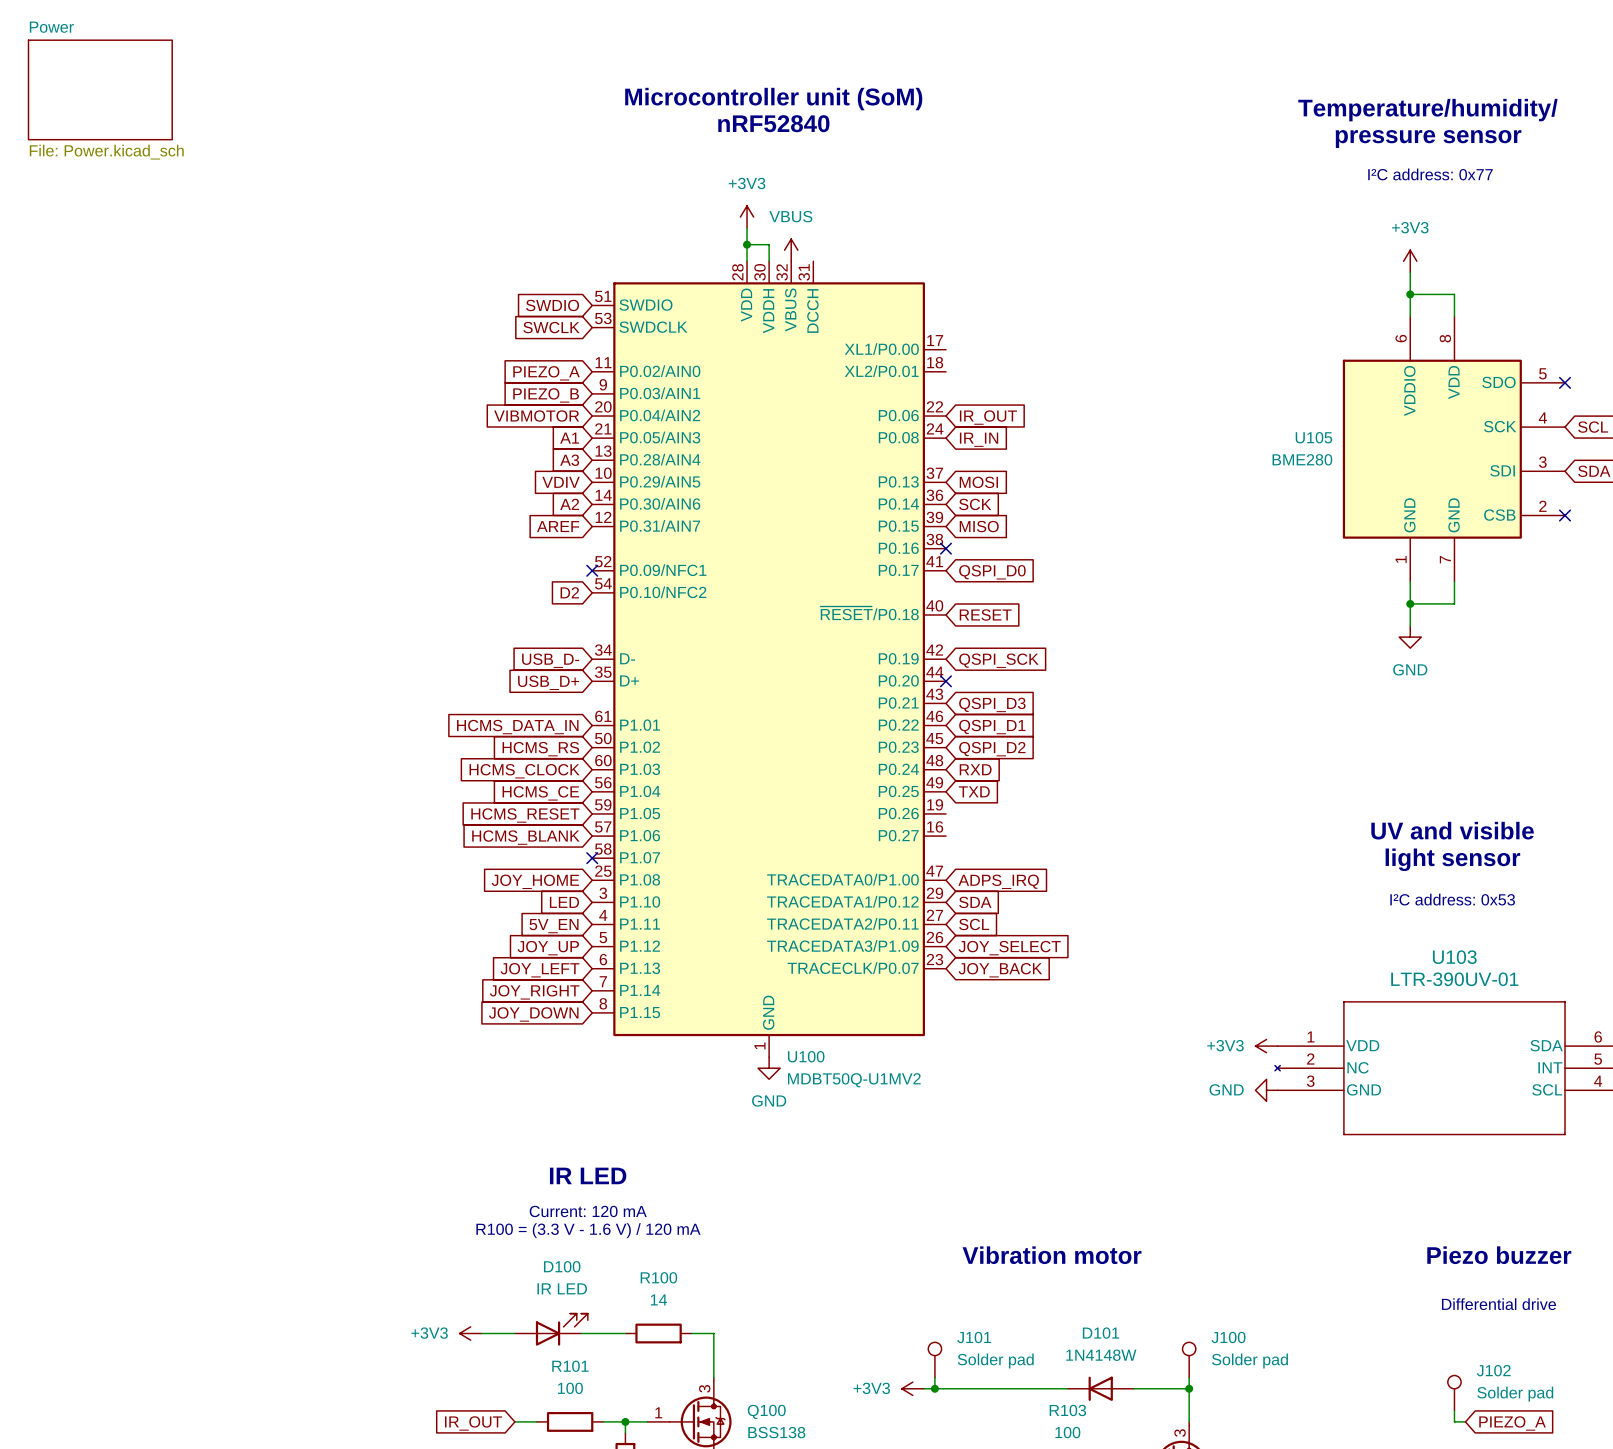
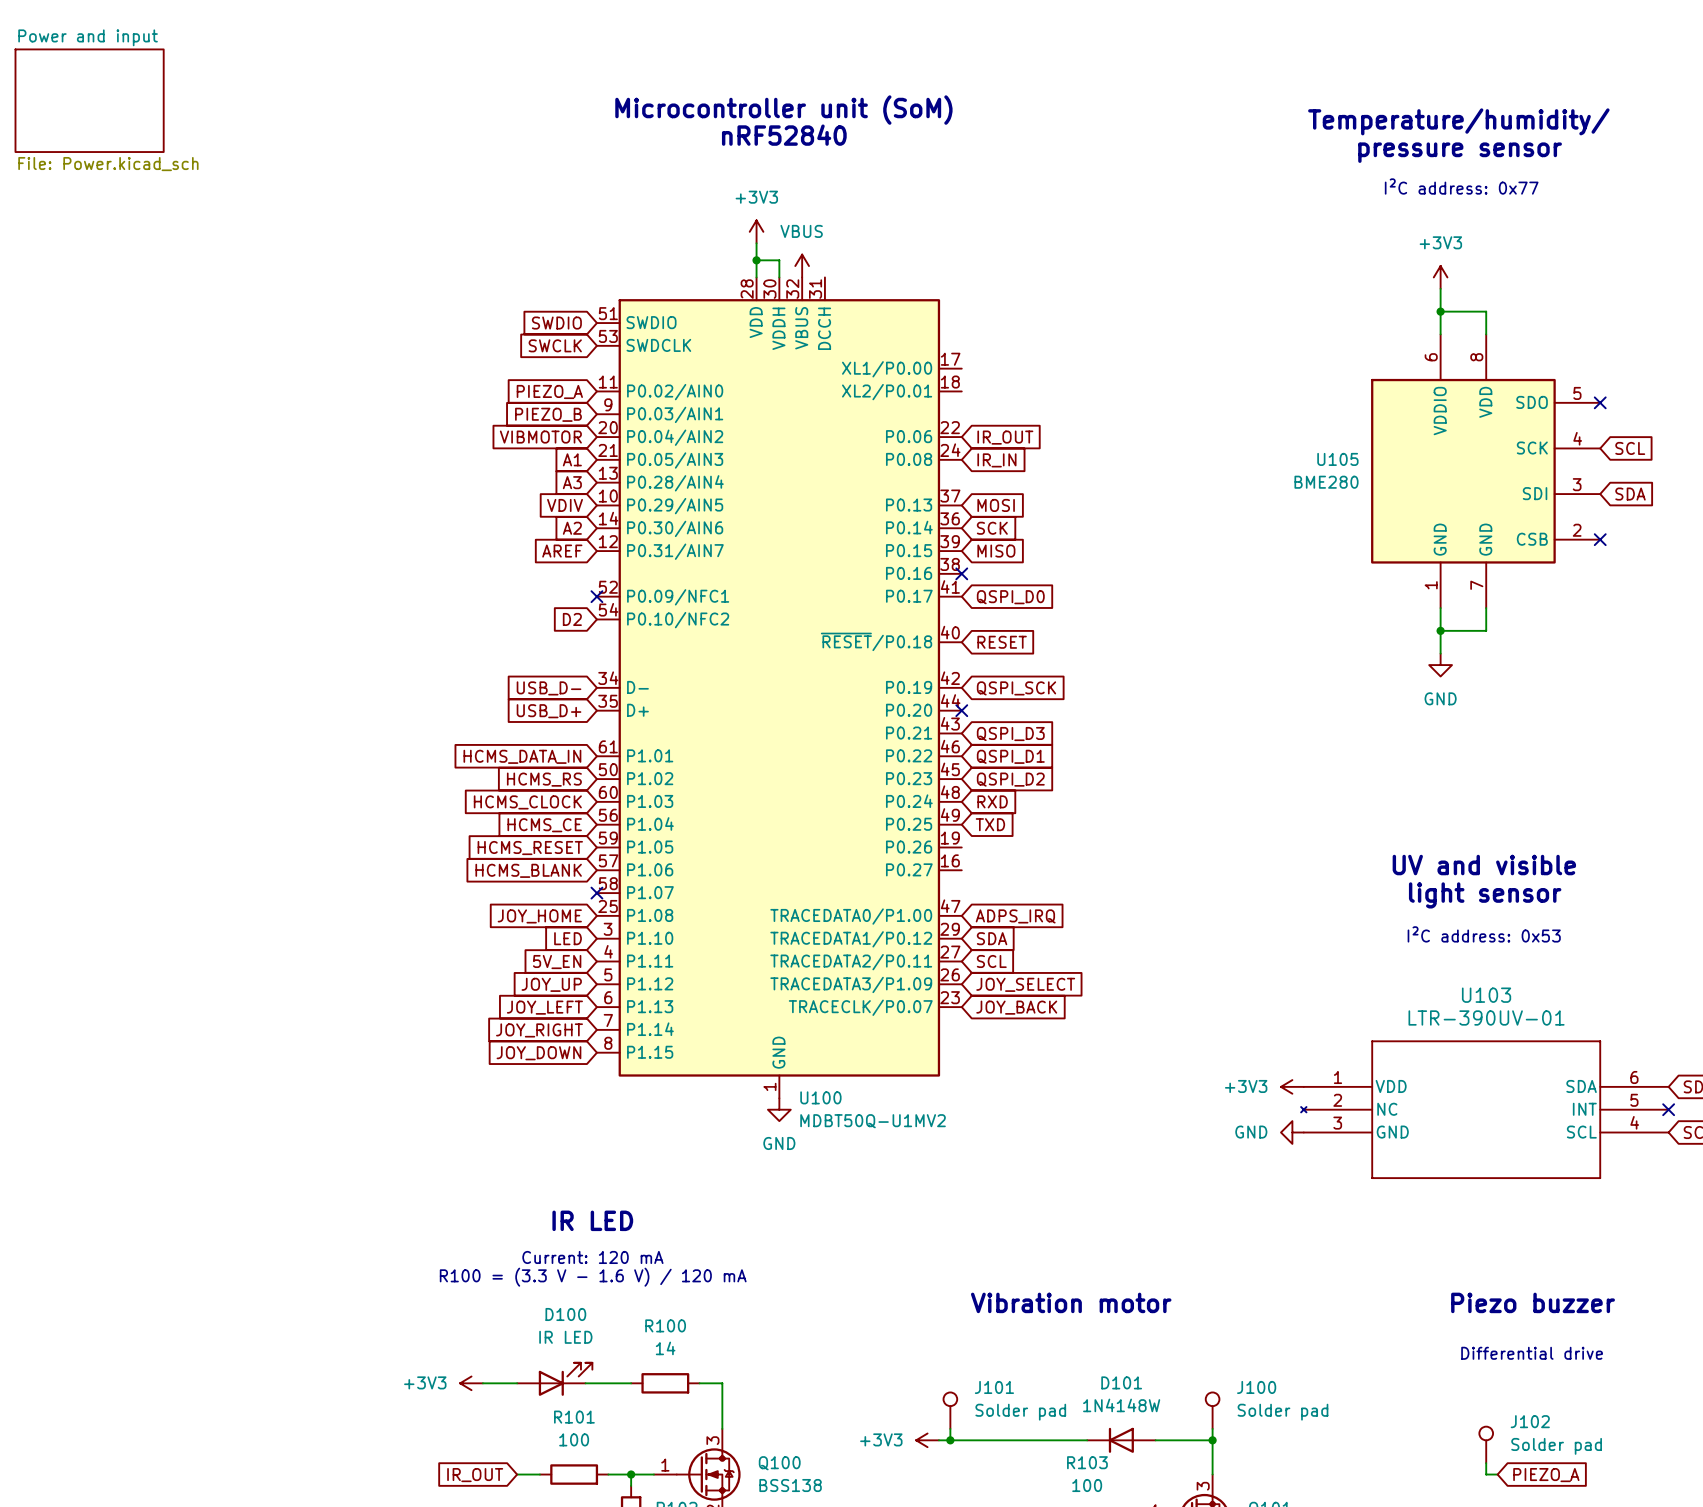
sheet Power name: Power (51, 27) -> Power and input (88, 37)

